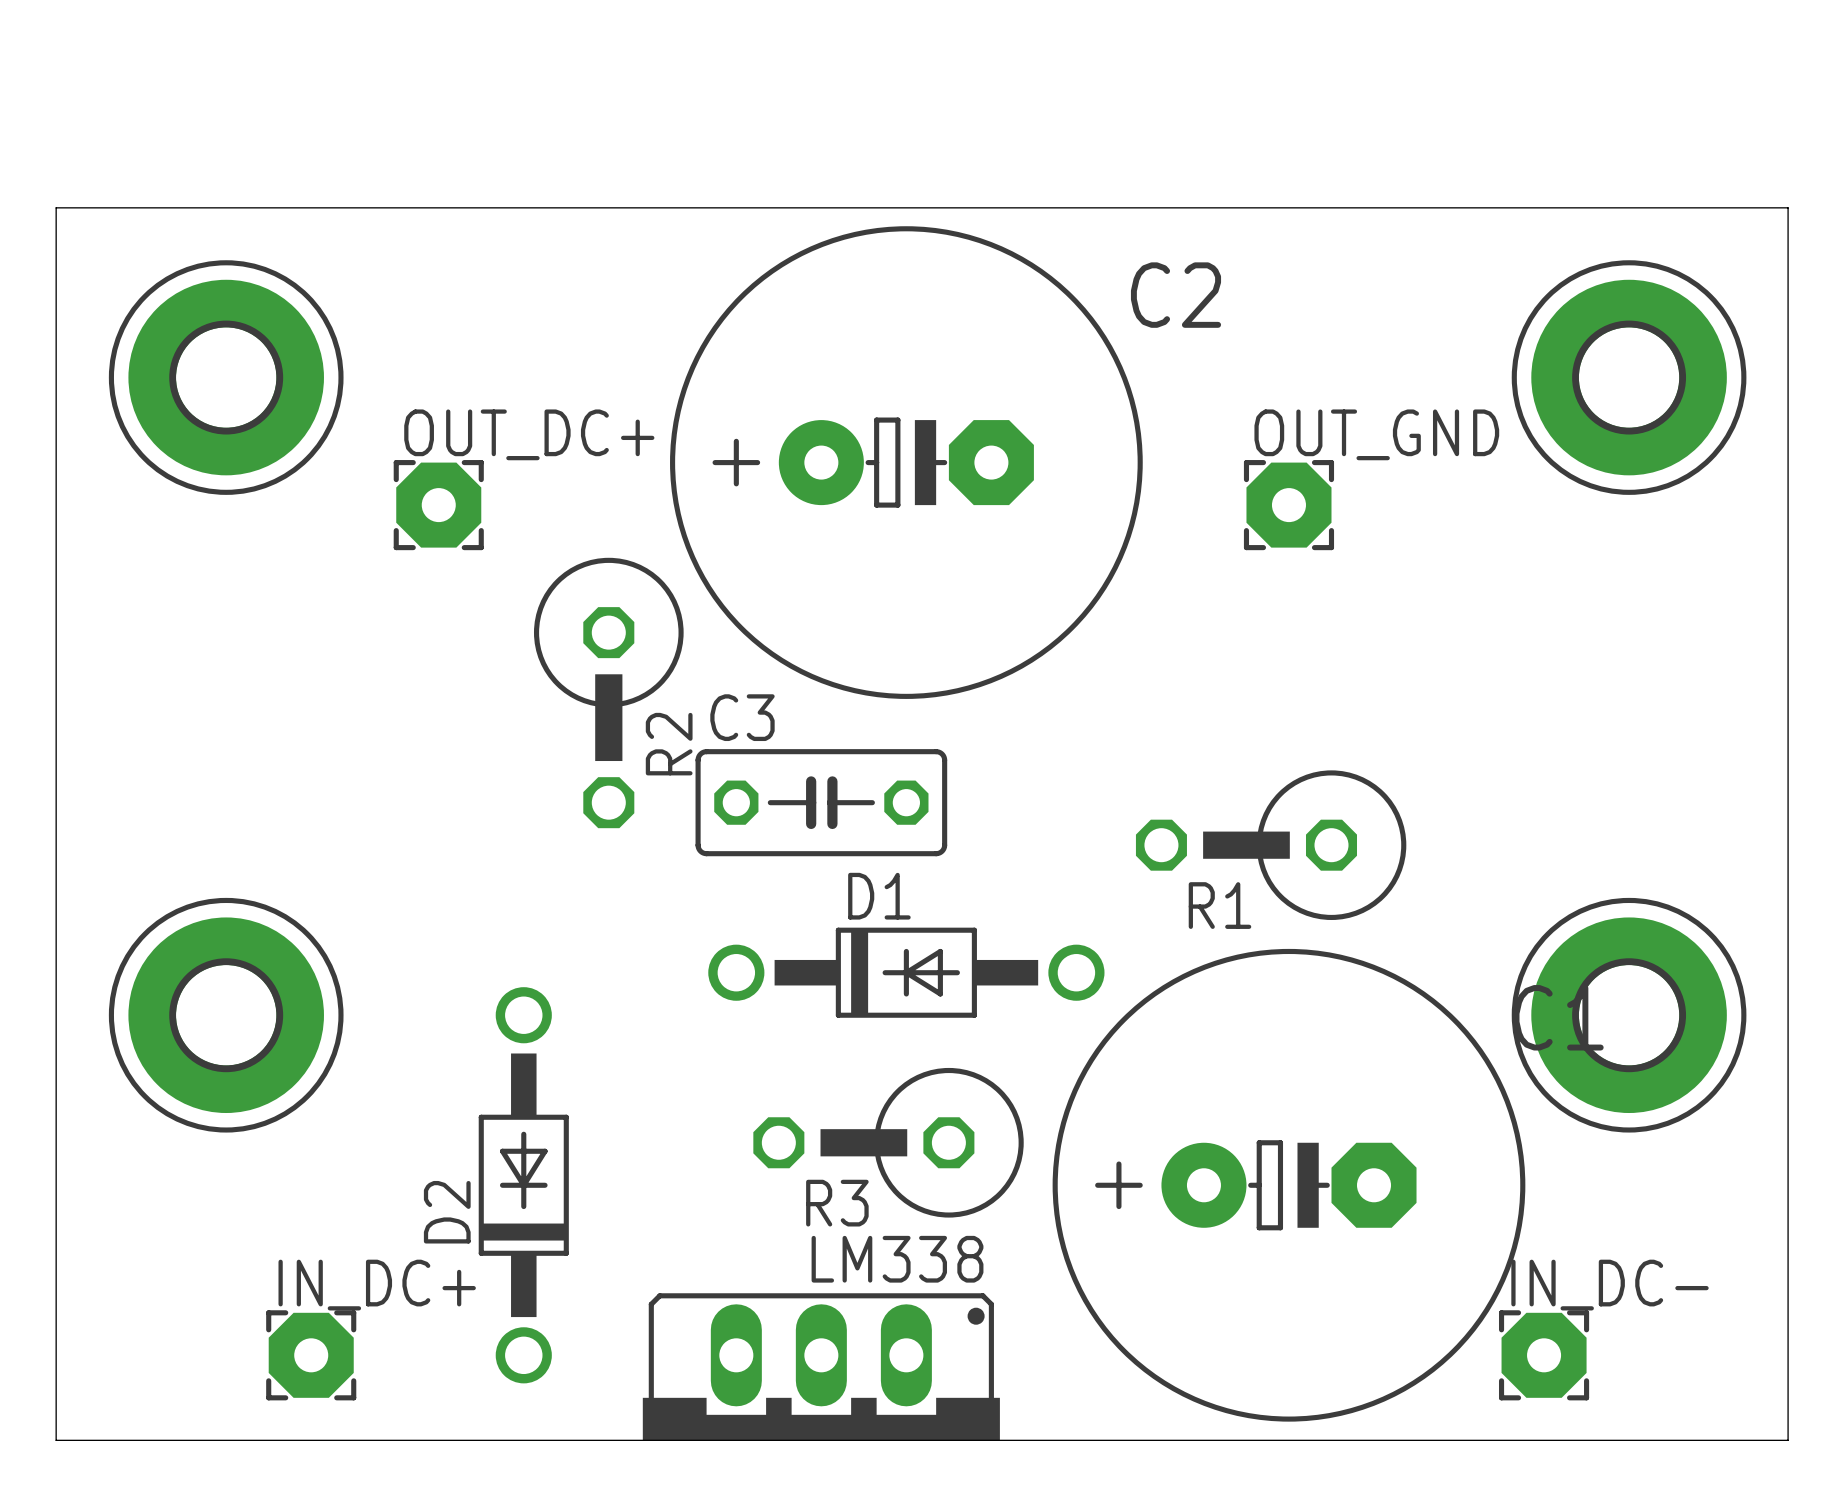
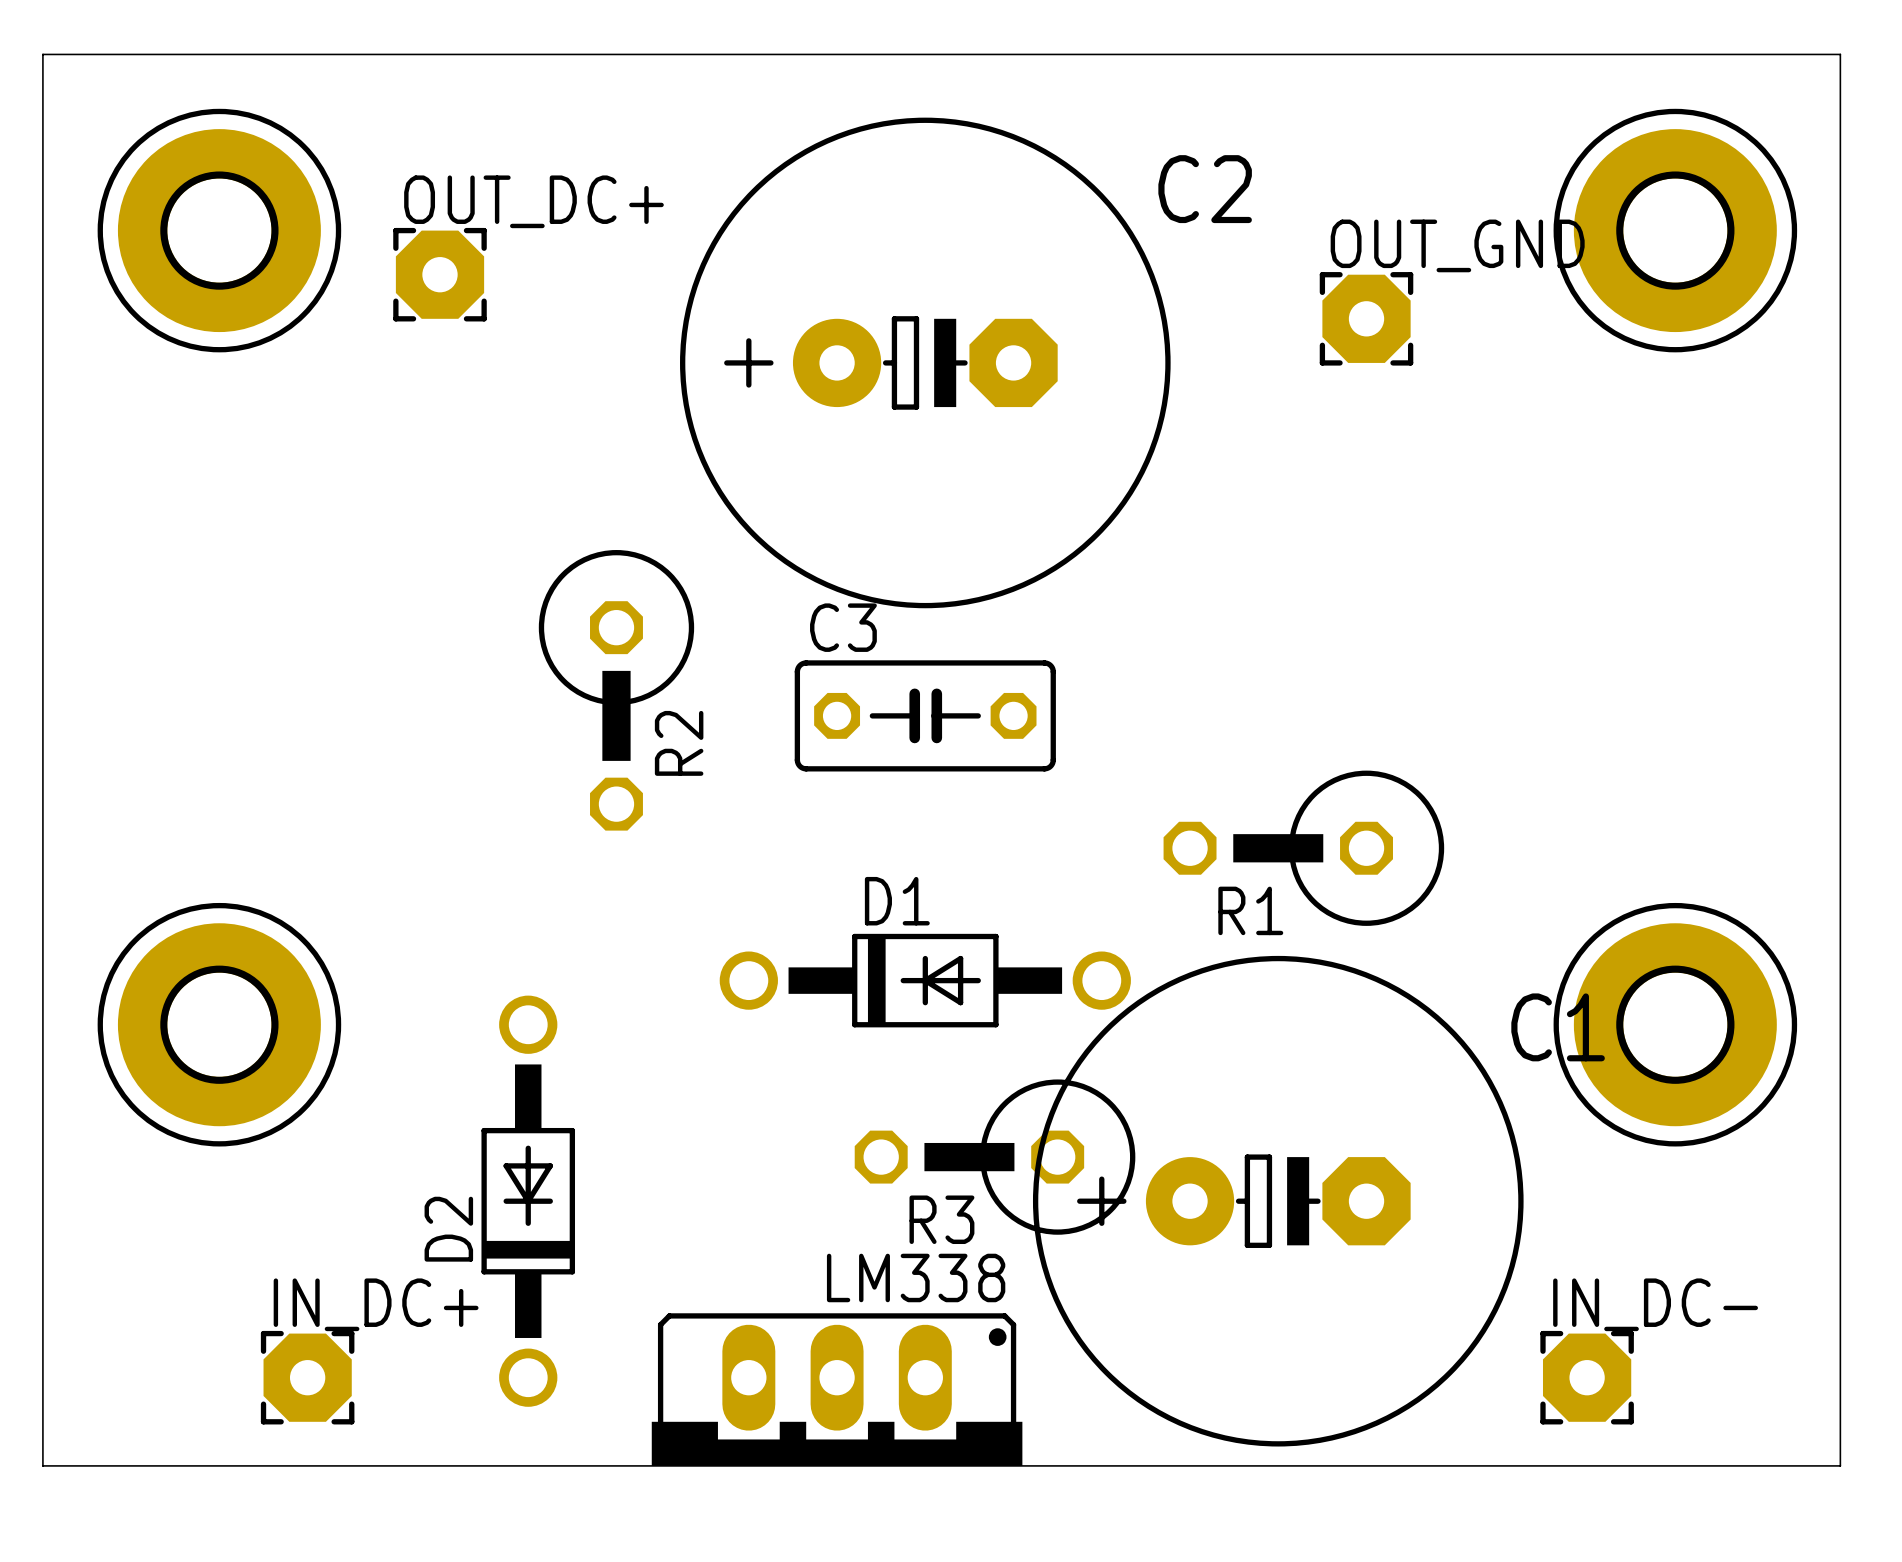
board edge: (56, 207) (1788, 207) -> (42, 186) (42, 54) (1840, 54) (1840, 186)
part position: (226, 377) -> (219, 230)
part position: (1629, 377) -> (1675, 230)
C2 position: (906, 462) -> (925, 362)
OUT_DC+ position: (438, 505) -> (440, 274)
OUT_GND position: (1288, 505) -> (1366, 318)
C3 position: (821, 802) -> (925, 715)
R3 position: (888, 1142) -> (995, 1157)
C1 position: (1288, 1185) -> (1278, 1201)

